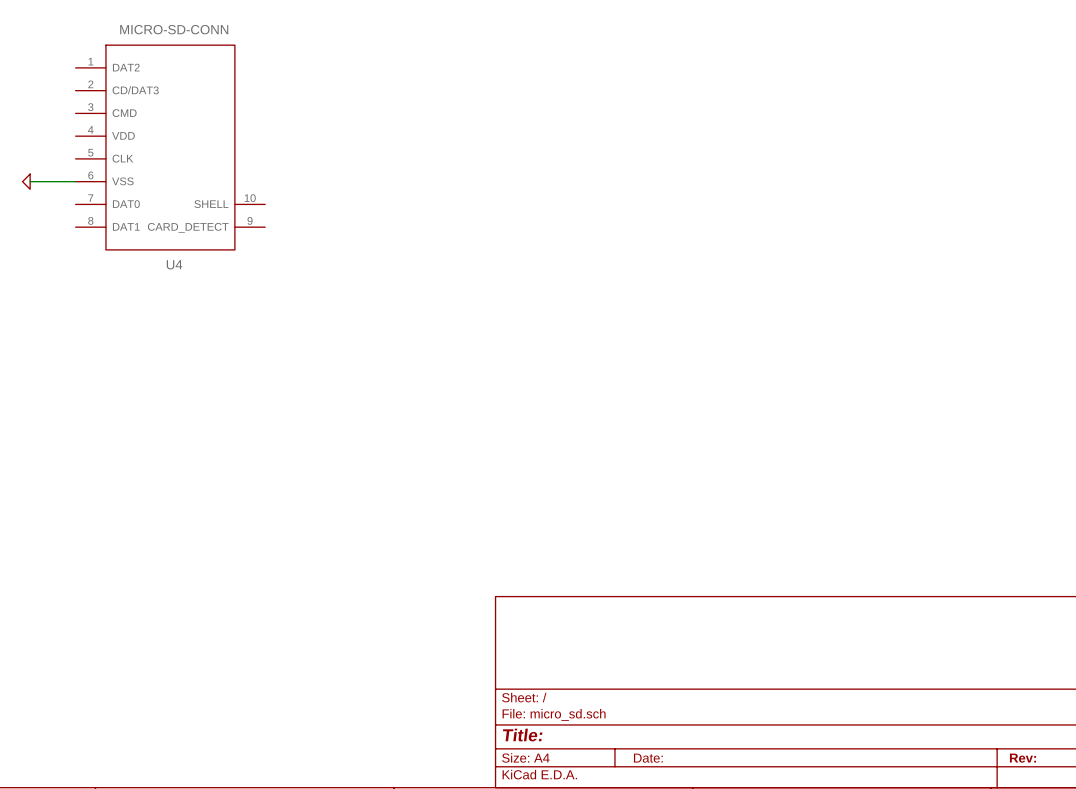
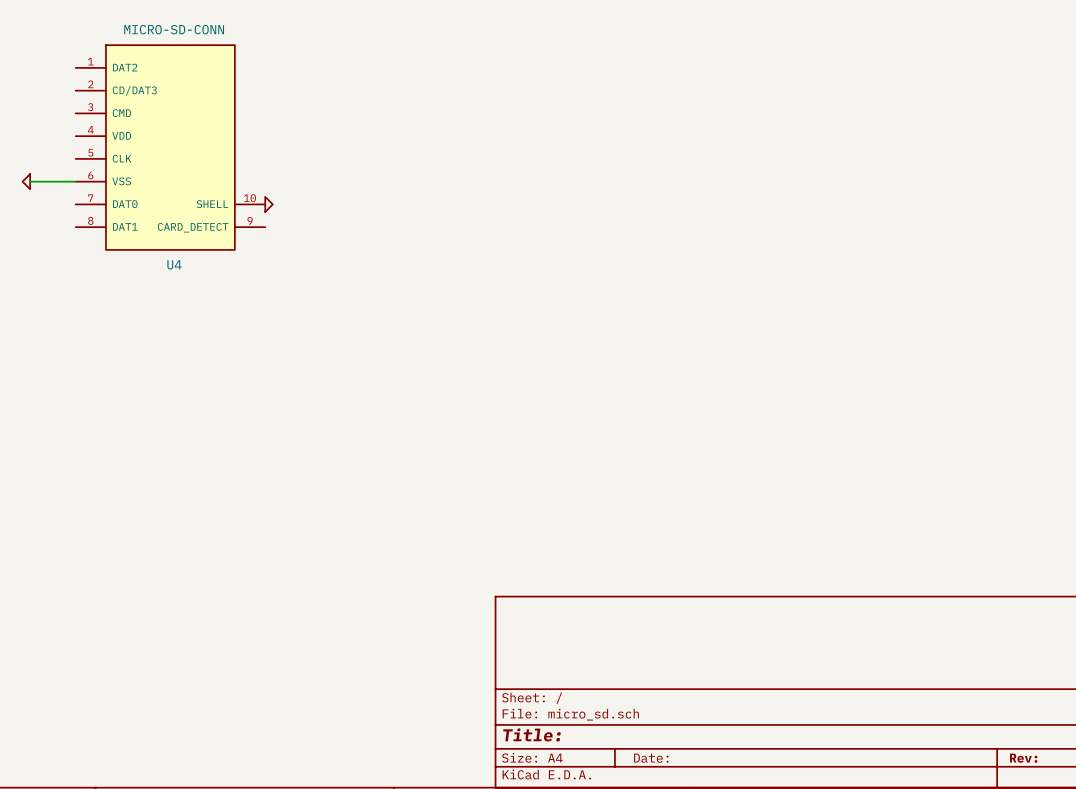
power symbol: none -> (269, 204)

